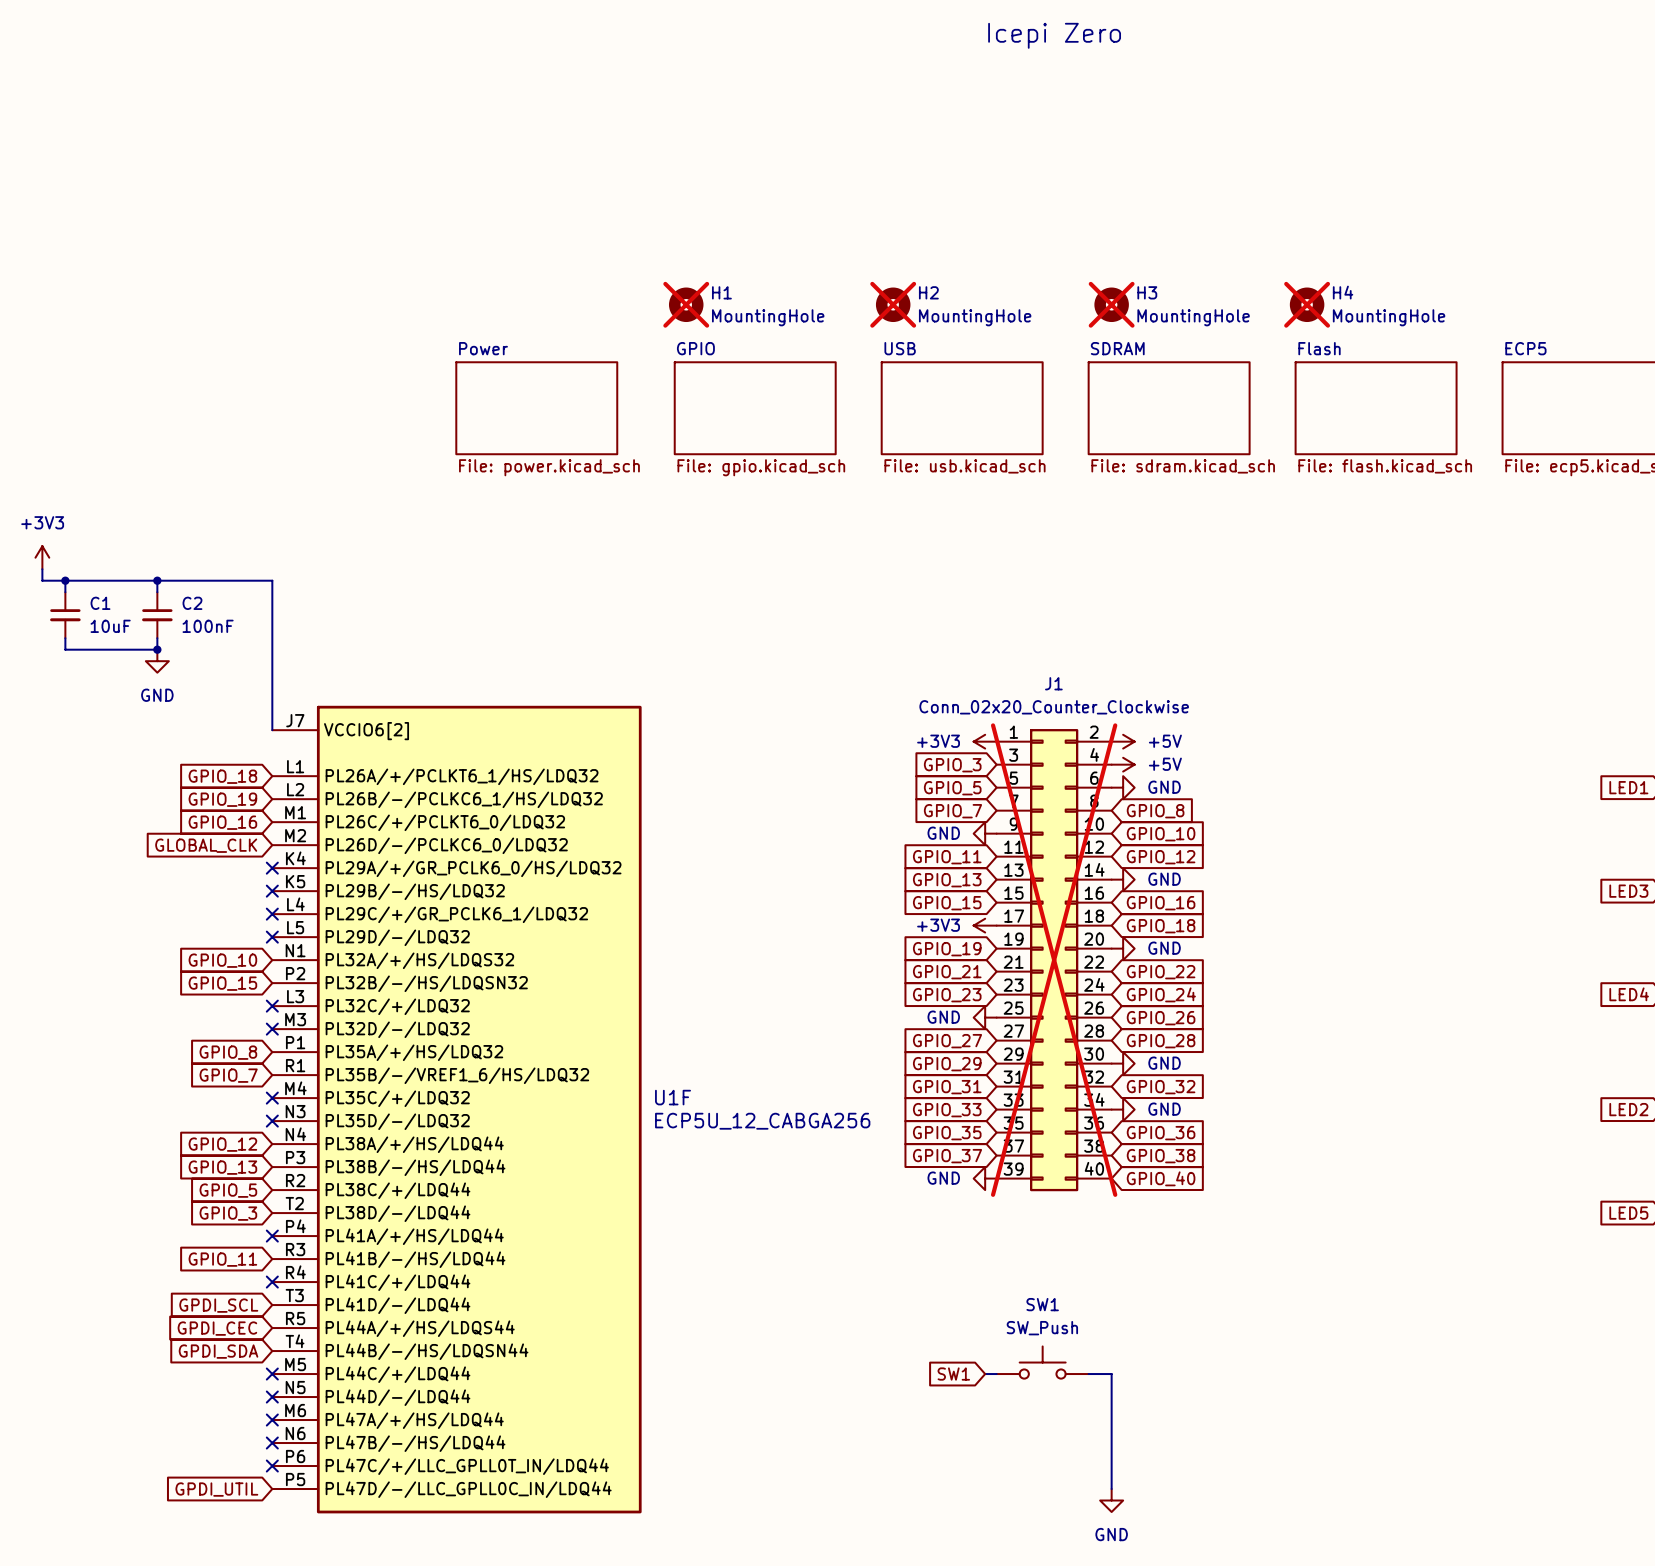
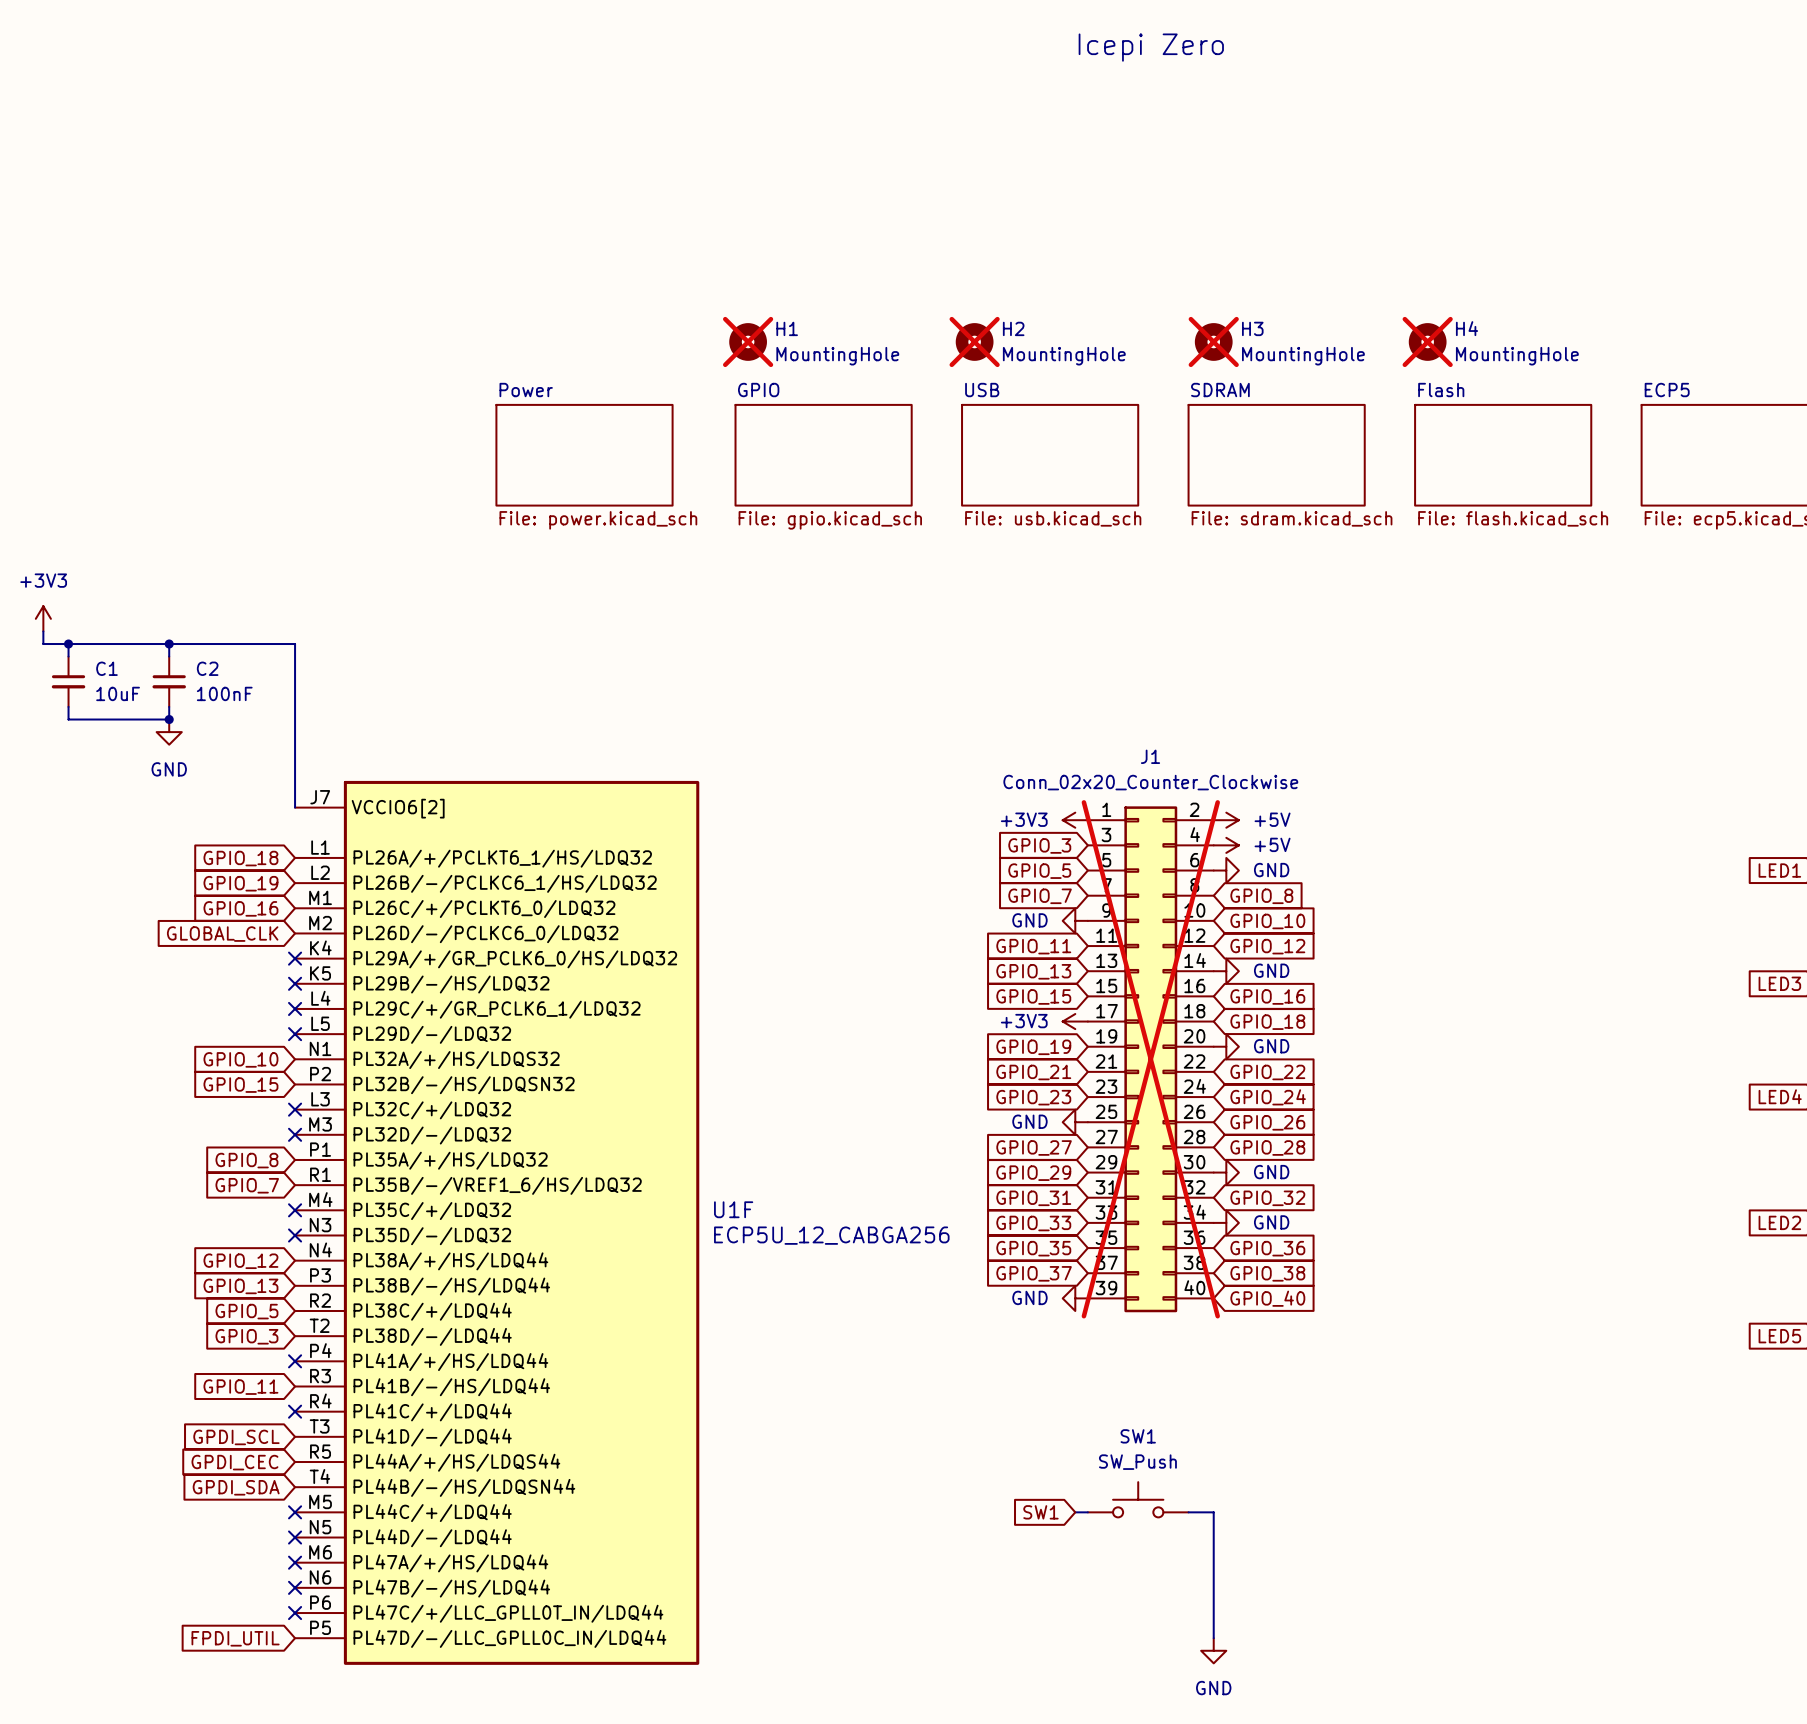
global label: GPDI_UTIL (216, 1489) -> FPDI_UTIL (235, 1638)

